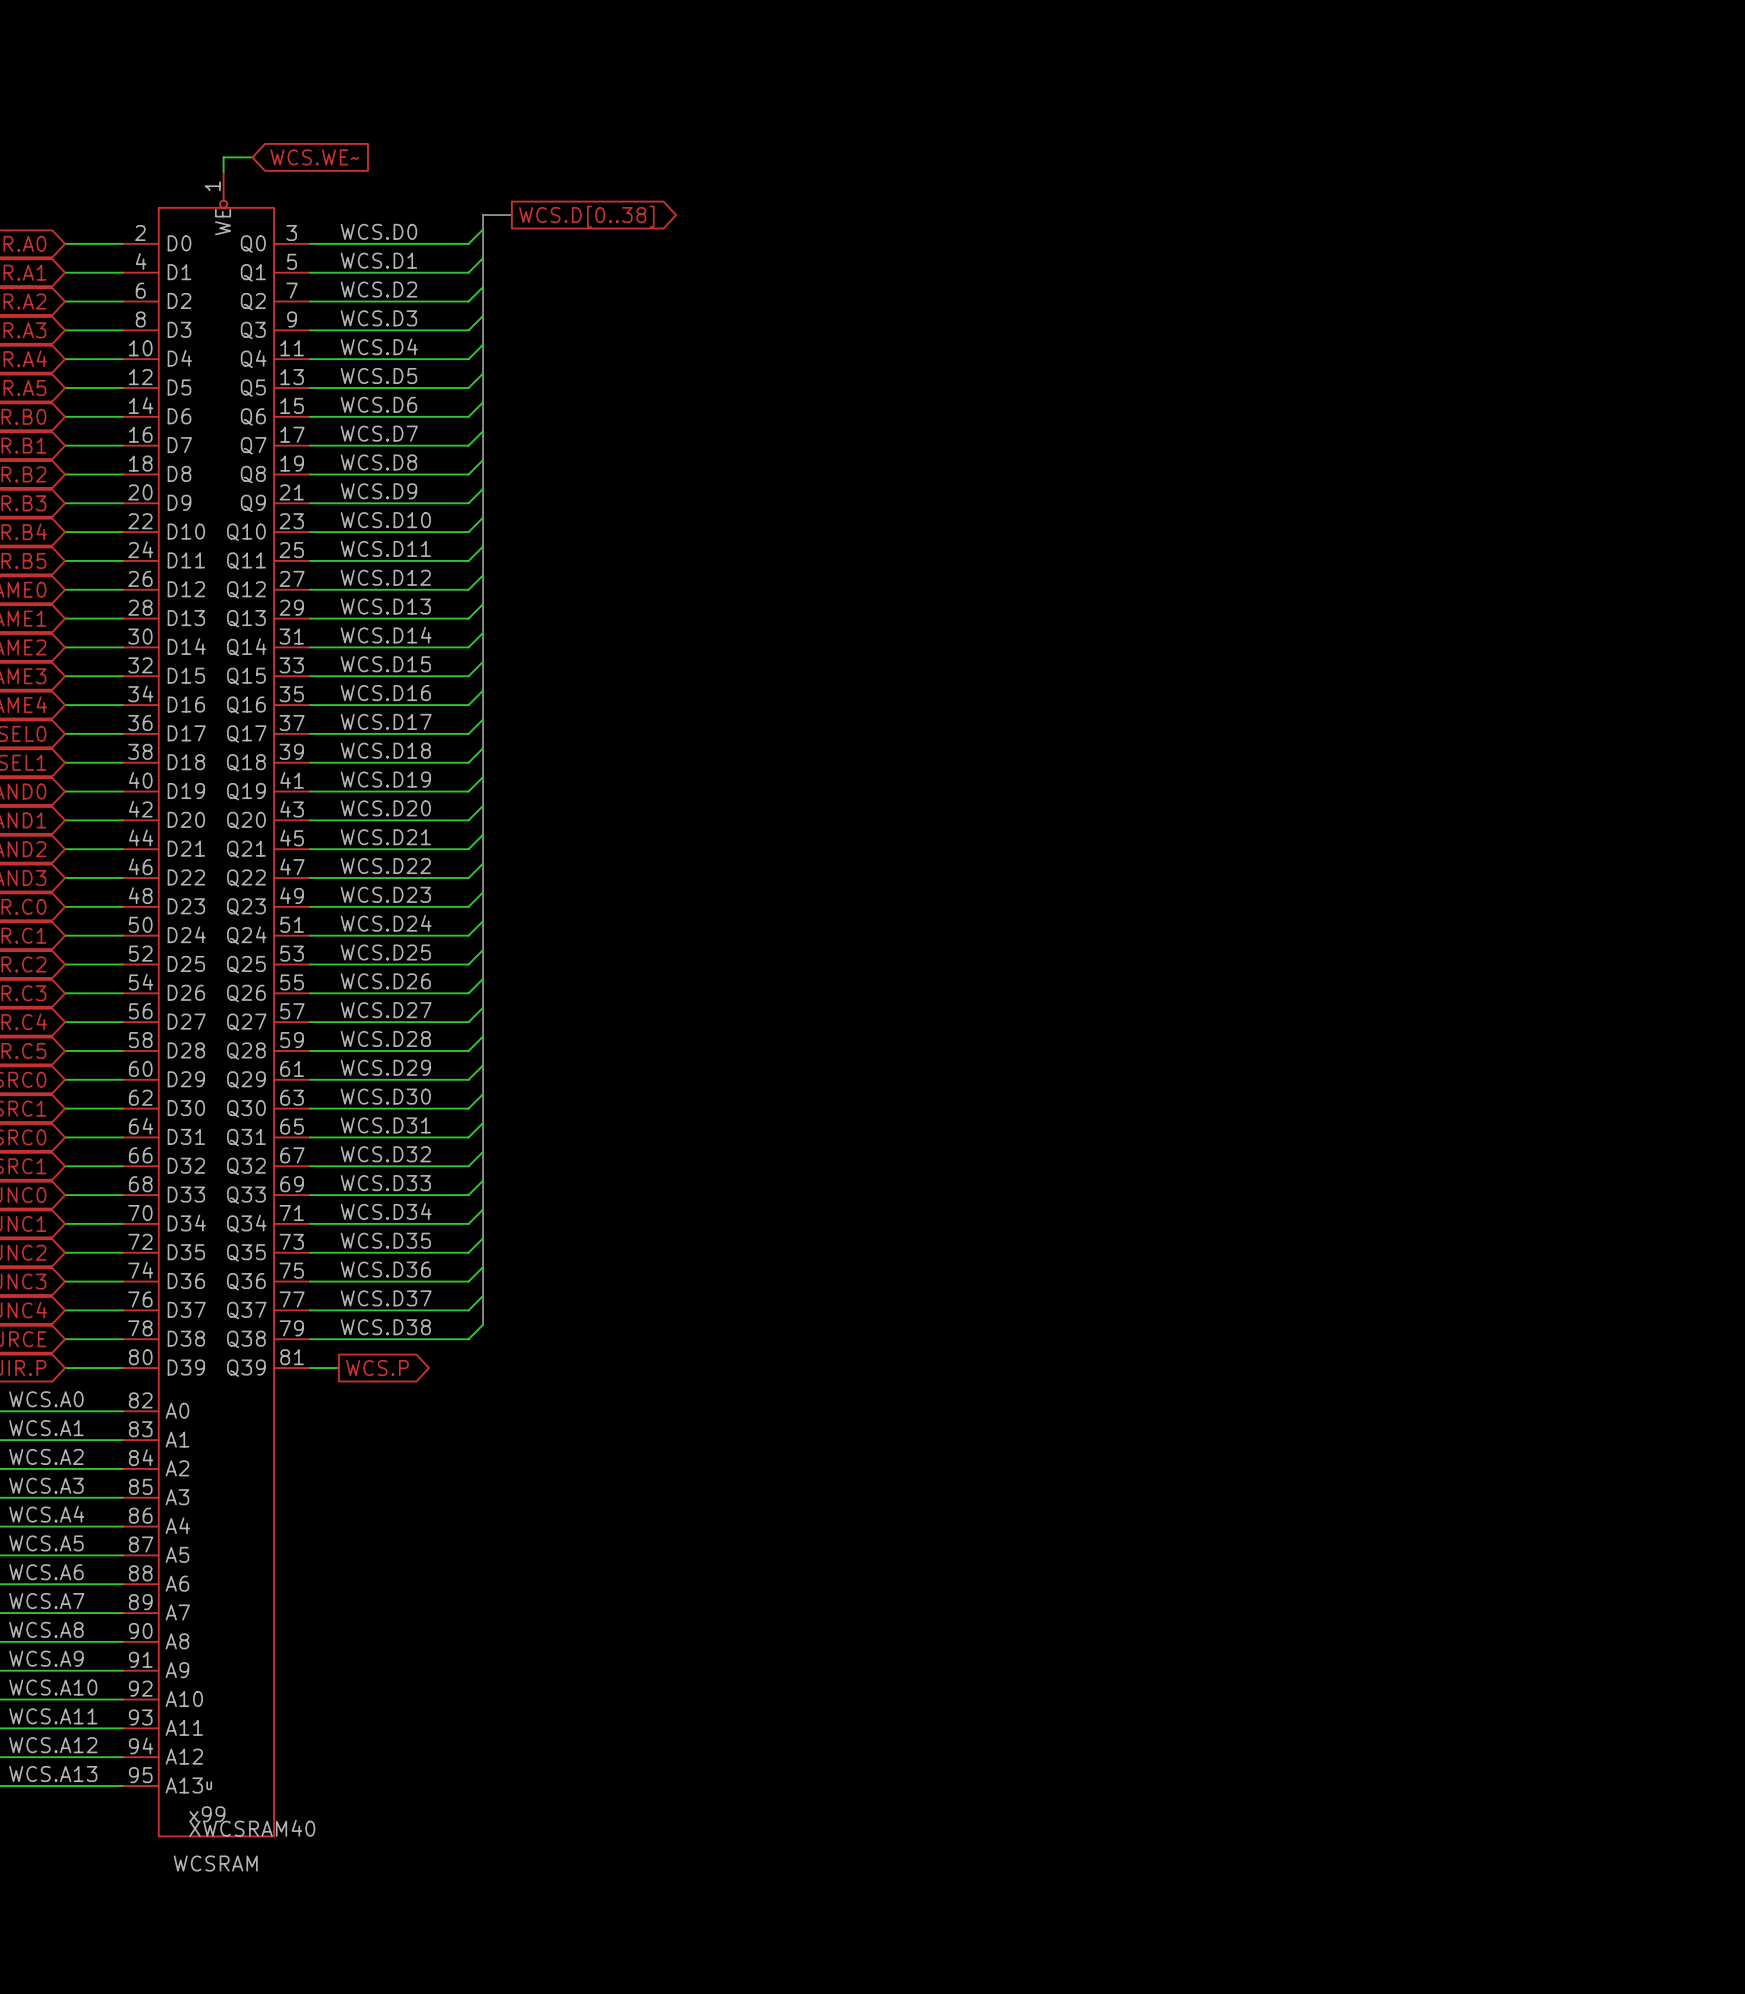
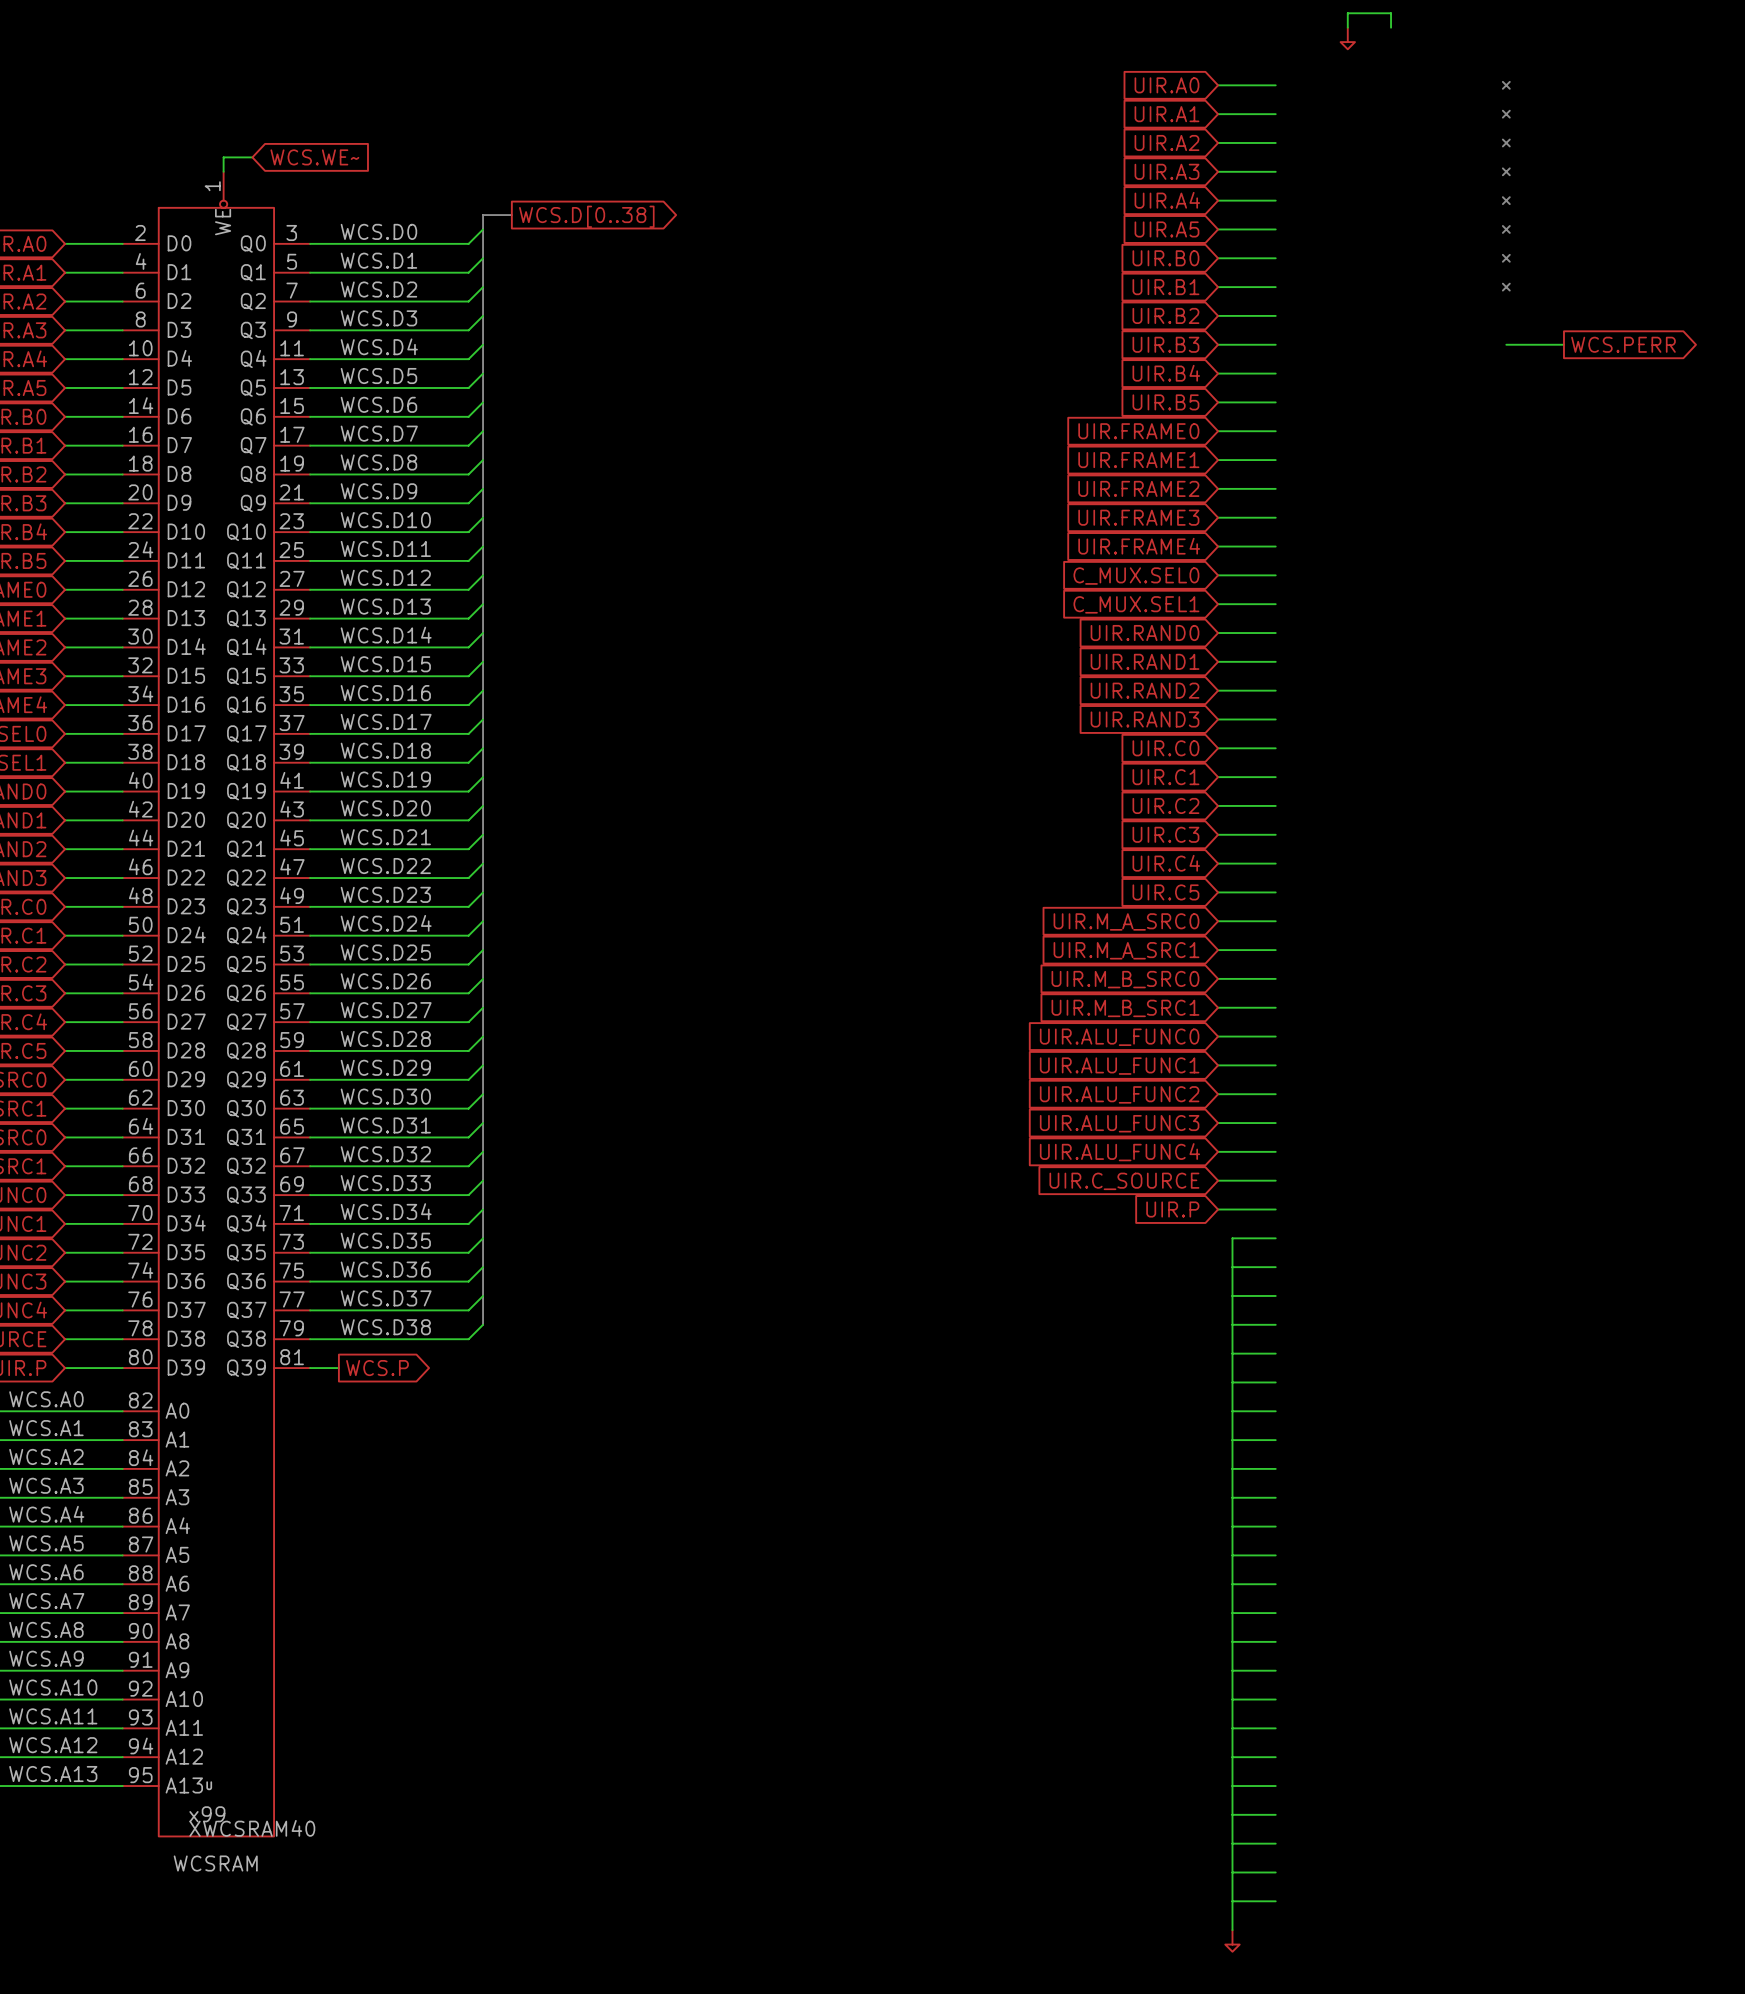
wire: none -> (1347, 27) (1347, 13) (1391, 13) (1391, 27)
power symbol: none -> (1347, 38)
global label: none -> UIR.A0 (1166, 85)
wire: none -> (1218, 85) (1275, 85)
no-connect mark: none -> (1506, 85)
global label: none -> UIR.A1 (1166, 114)
wire: none -> (1218, 114) (1275, 114)
no-connect mark: none -> (1506, 114)
global label: none -> UIR.A2 (1166, 142)
wire: none -> (1218, 142) (1275, 142)
no-connect mark: none -> (1506, 142)
global label: none -> UIR.A3 (1166, 171)
wire: none -> (1218, 171) (1275, 171)
no-connect mark: none -> (1506, 171)
global label: none -> UIR.A4 (1167, 200)
wire: none -> (1218, 200) (1275, 200)
no-connect mark: none -> (1506, 200)
global label: none -> UIR.A5 (1166, 229)
wire: none -> (1218, 229) (1275, 229)
no-connect mark: none -> (1506, 229)
global label: none -> UIR.B0 (1165, 258)
wire: none -> (1218, 258) (1275, 258)
no-connect mark: none -> (1506, 258)
global label: none -> UIR.B1 (1165, 287)
wire: none -> (1218, 287) (1275, 287)
no-connect mark: none -> (1506, 287)
global label: none -> UIR.B2 (1165, 315)
wire: none -> (1218, 315) (1275, 315)
global label: none -> UIR.B3 (1165, 344)
wire: none -> (1218, 344) (1275, 344)
wire: none -> (1506, 344) (1563, 344)
global label: none -> WCS.PERR (1623, 344)
global label: none -> UIR.B4 (1166, 373)
wire: none -> (1218, 373) (1275, 373)
global label: none -> UIR.B5 (1165, 402)
wire: none -> (1218, 402) (1275, 402)
global label: none -> UIR.FRAME0 (1138, 431)
wire: none -> (1218, 431) (1275, 431)
global label: none -> UIR.FRAME1 (1138, 460)
wire: none -> (1218, 460) (1275, 460)
global label: none -> UIR.FRAME2 (1138, 488)
wire: none -> (1218, 488) (1275, 488)
global label: none -> UIR.FRAME3 (1138, 517)
wire: none -> (1218, 517) (1275, 517)
global label: none -> UIR.FRAME4 (1139, 546)
wire: none -> (1218, 546) (1275, 546)
wire: none -> (1218, 575) (1275, 575)
global label: none -> C_MUX.SEL0 (1136, 576)
global label: none -> C_MUX.SEL1 (1136, 604)
wire: none -> (1218, 604) (1275, 604)
global label: none -> UIR.RAND0 (1145, 633)
wire: none -> (1218, 633) (1275, 633)
global label: none -> UIR.RAND1 (1145, 661)
wire: none -> (1218, 661) (1275, 661)
global label: none -> UIR.RAND2 (1145, 690)
wire: none -> (1218, 690) (1275, 690)
global label: none -> UIR.RAND3 (1145, 719)
wire: none -> (1218, 719) (1275, 719)
global label: none -> UIR.C0 (1165, 748)
wire: none -> (1218, 748) (1275, 748)
global label: none -> UIR.C1 (1165, 777)
wire: none -> (1218, 777) (1275, 777)
global label: none -> UIR.C2 (1165, 805)
wire: none -> (1218, 805) (1275, 805)
global label: none -> UIR.C3 (1165, 834)
wire: none -> (1218, 834) (1275, 834)
global label: none -> UIR.C4 (1166, 863)
wire: none -> (1218, 863) (1275, 863)
global label: none -> UIR.C5 (1165, 892)
wire: none -> (1218, 892) (1275, 892)
global label: none -> UIR.M_A_SRC0 (1126, 921)
wire: none -> (1218, 921) (1275, 921)
global label: none -> UIR.M_A_SRC1 (1126, 950)
wire: none -> (1218, 950) (1275, 950)
wire: none -> (1218, 978) (1275, 978)
global label: none -> UIR.M_B_SRC0 (1125, 979)
wire: none -> (1218, 1007) (1275, 1007)
global label: none -> UIR.M_B_SRC1 (1125, 1008)
wire: none -> (1218, 1036) (1275, 1036)
global label: none -> UIR.ALU_FUNC0 (1119, 1037)
wire: none -> (1218, 1065) (1275, 1065)
global label: none -> UIR.ALU_FUNC1 (1119, 1066)
global label: none -> UIR.ALU_FUNC2 (1119, 1094)
wire: none -> (1218, 1094) (1275, 1094)
global label: none -> UIR.ALU_FUNC3 (1119, 1123)
wire: none -> (1218, 1123) (1275, 1123)
wire: none -> (1218, 1151) (1275, 1151)
global label: none -> UIR.ALU_FUNC4 (1119, 1152)
wire: none -> (1218, 1180) (1275, 1180)
global label: none -> UIR.C_SOURCE (1124, 1181)
global label: none -> UIR.P (1172, 1209)
wire: none -> (1218, 1209) (1275, 1209)
wire: none -> (1275, 1238) (1232, 1238) (1232, 1930)
wire: none -> (1232, 1267) (1275, 1267)
wire: none -> (1232, 1295) (1275, 1295)
wire: none -> (1232, 1324) (1275, 1324)
wire: none -> (1232, 1353) (1275, 1353)
wire: none -> (1232, 1382) (1275, 1382)
wire: none -> (1232, 1411) (1275, 1411)
wire: none -> (1232, 1440) (1275, 1440)
wire: none -> (1232, 1468) (1275, 1468)
wire: none -> (1232, 1497) (1275, 1497)
wire: none -> (1232, 1526) (1275, 1526)
wire: none -> (1232, 1555) (1275, 1555)
wire: none -> (1232, 1584) (1275, 1584)
wire: none -> (1232, 1613) (1275, 1613)
wire: none -> (1232, 1641) (1275, 1641)
wire: none -> (1232, 1670) (1275, 1670)
wire: none -> (1232, 1699) (1275, 1699)
wire: none -> (1232, 1728) (1275, 1728)
wire: none -> (1232, 1757) (1275, 1757)
wire: none -> (1232, 1786) (1275, 1786)
wire: none -> (1232, 1814) (1275, 1814)
wire: none -> (1232, 1843) (1275, 1843)
wire: none -> (1232, 1872) (1275, 1872)
wire: none -> (1232, 1901) (1275, 1901)
power symbol: none -> (1232, 1941)

